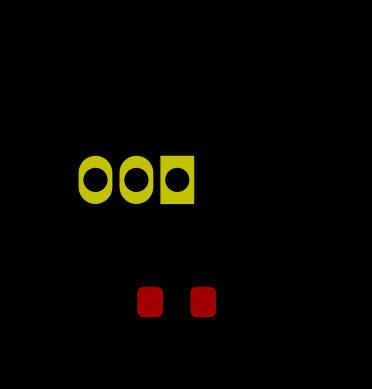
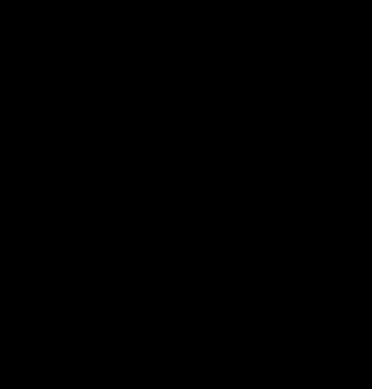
part: (136, 179) -> none
part: (176, 301) -> none

